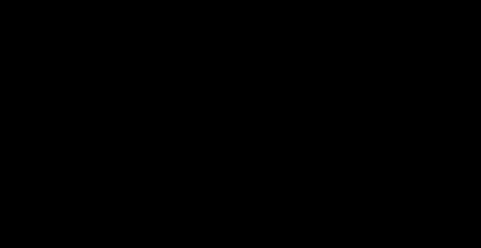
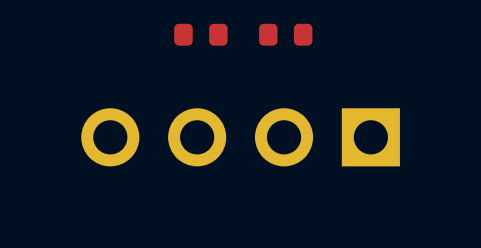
part: none -> (200, 34)
part: none -> (285, 34)
part: none -> (240, 137)

